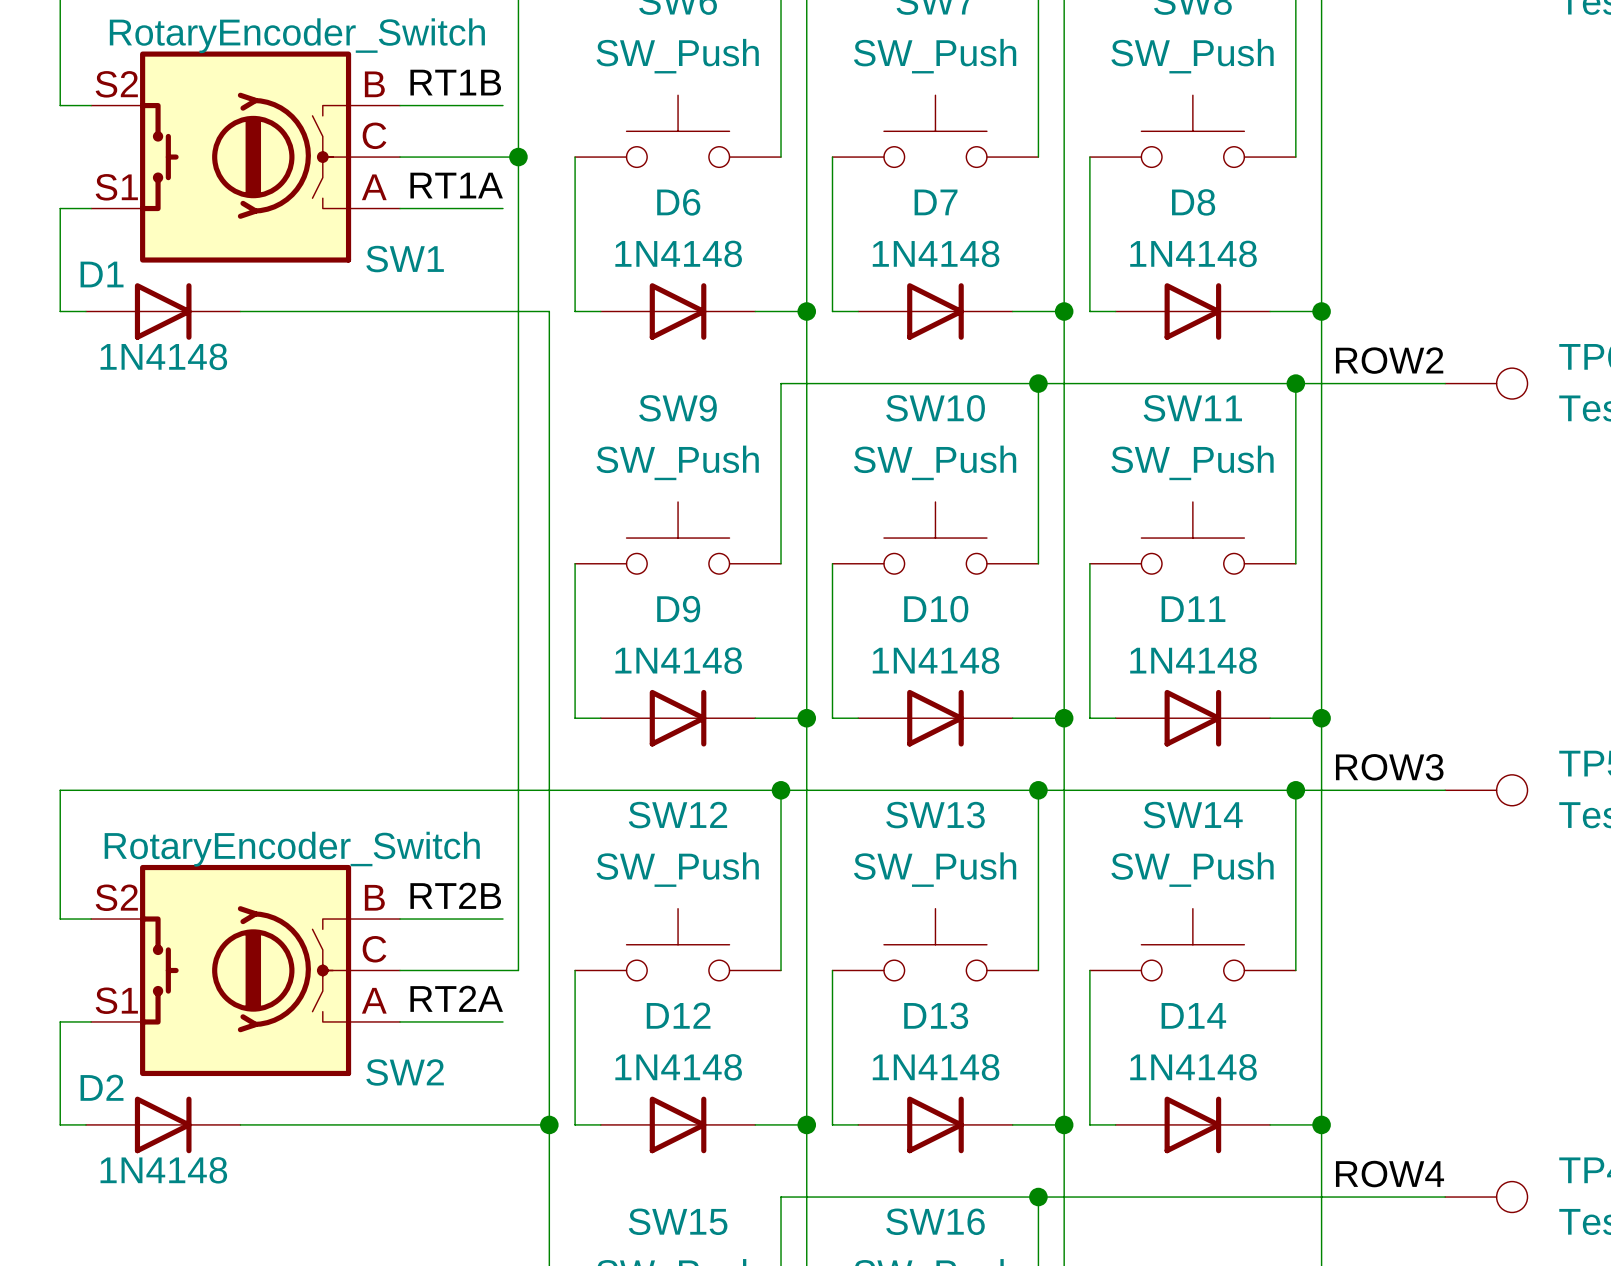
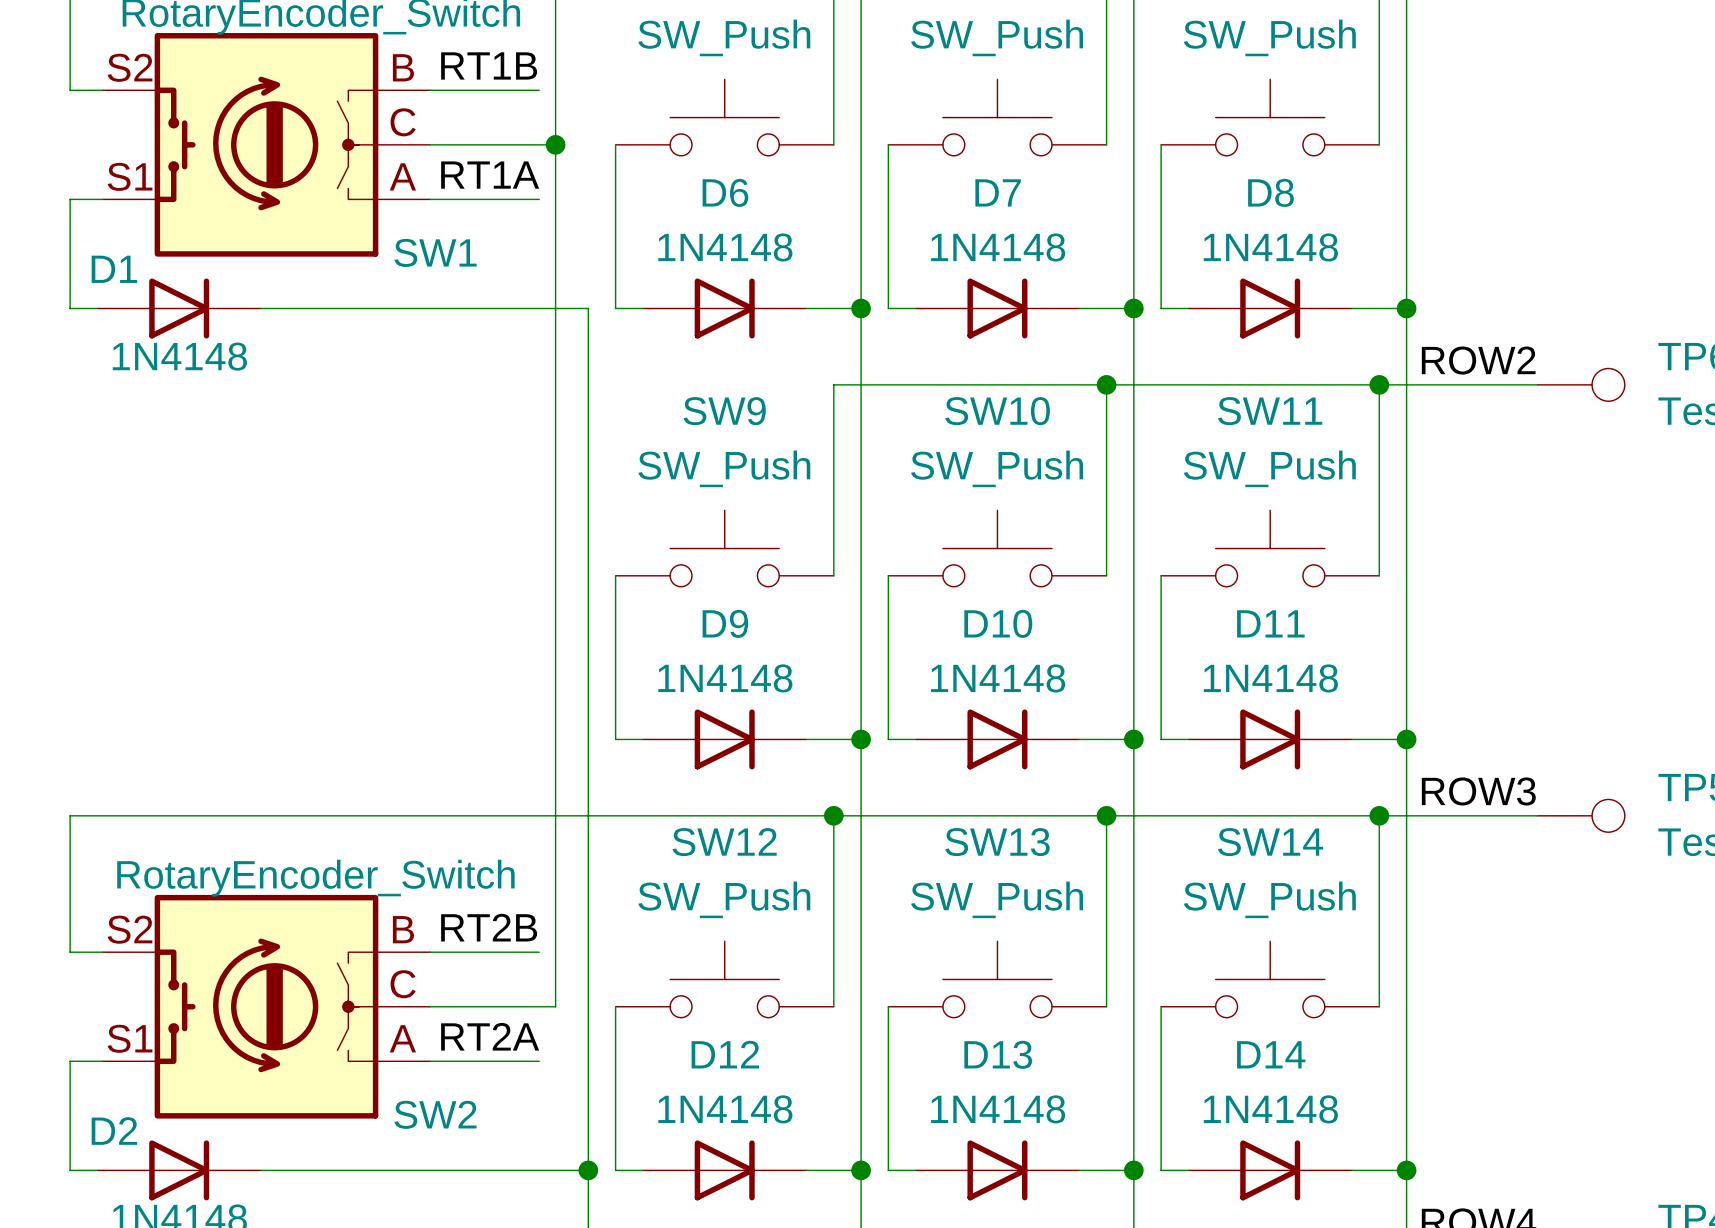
SW1 symbol: [91, 51, 401, 263] -> [102, 33, 431, 257]
SW2 symbol: [91, 864, 401, 1077] -> [102, 894, 431, 1119]

